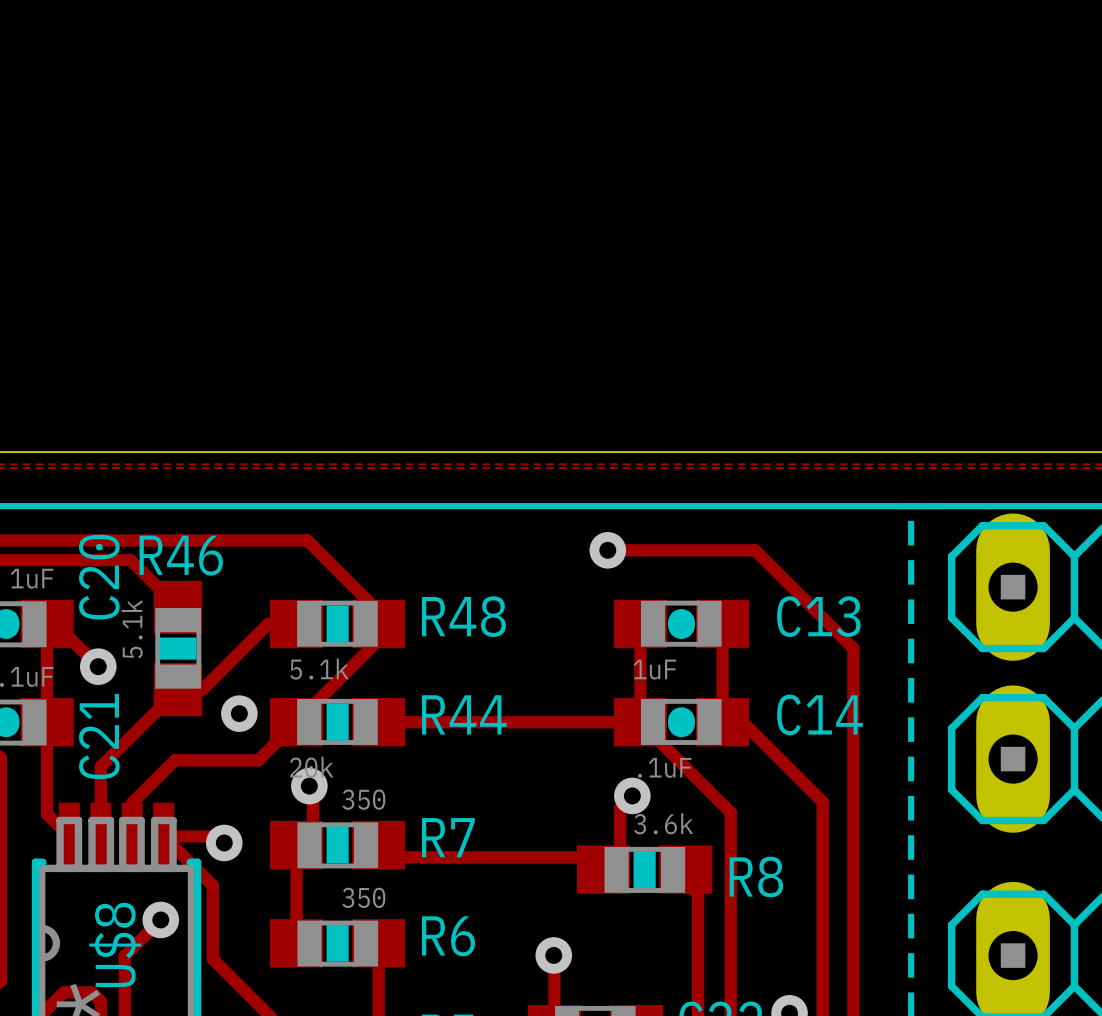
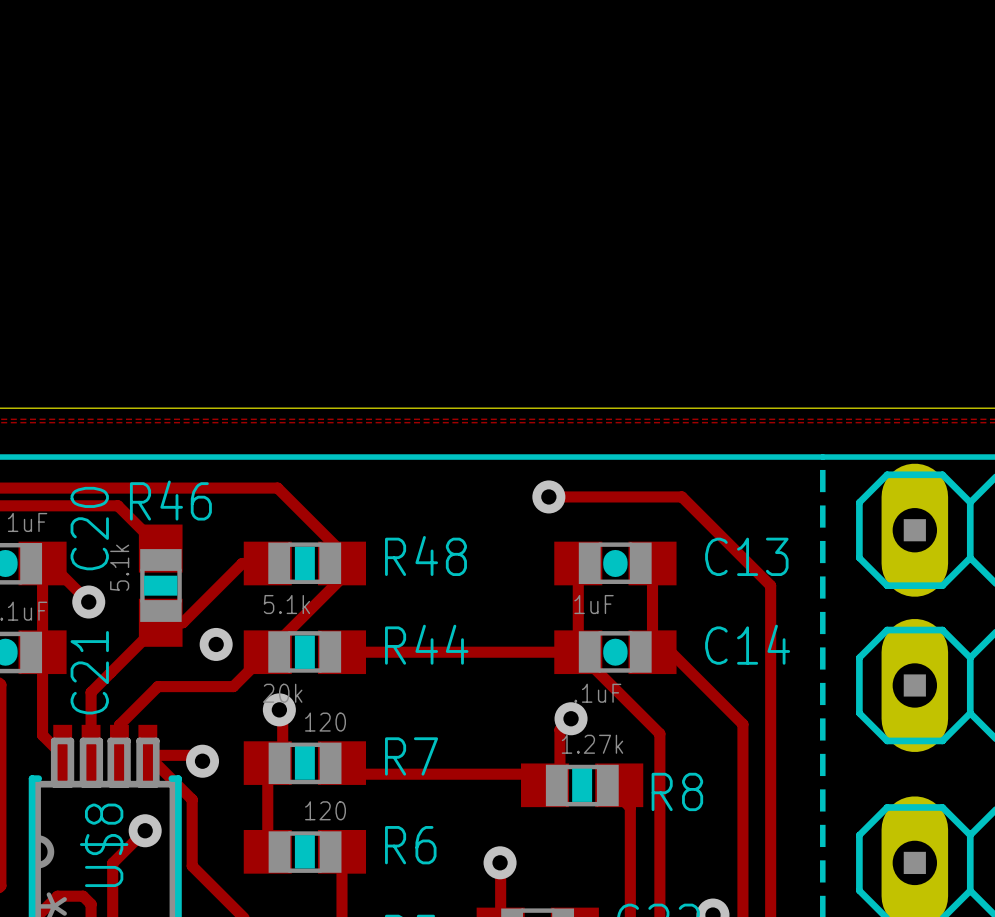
R7 value: 350 (363, 799) -> 120 (325, 722)
R8 value: 3.6k (663, 823) -> 1.27k (592, 744)
R6 value: 350 (363, 897) -> 120 (325, 810)

